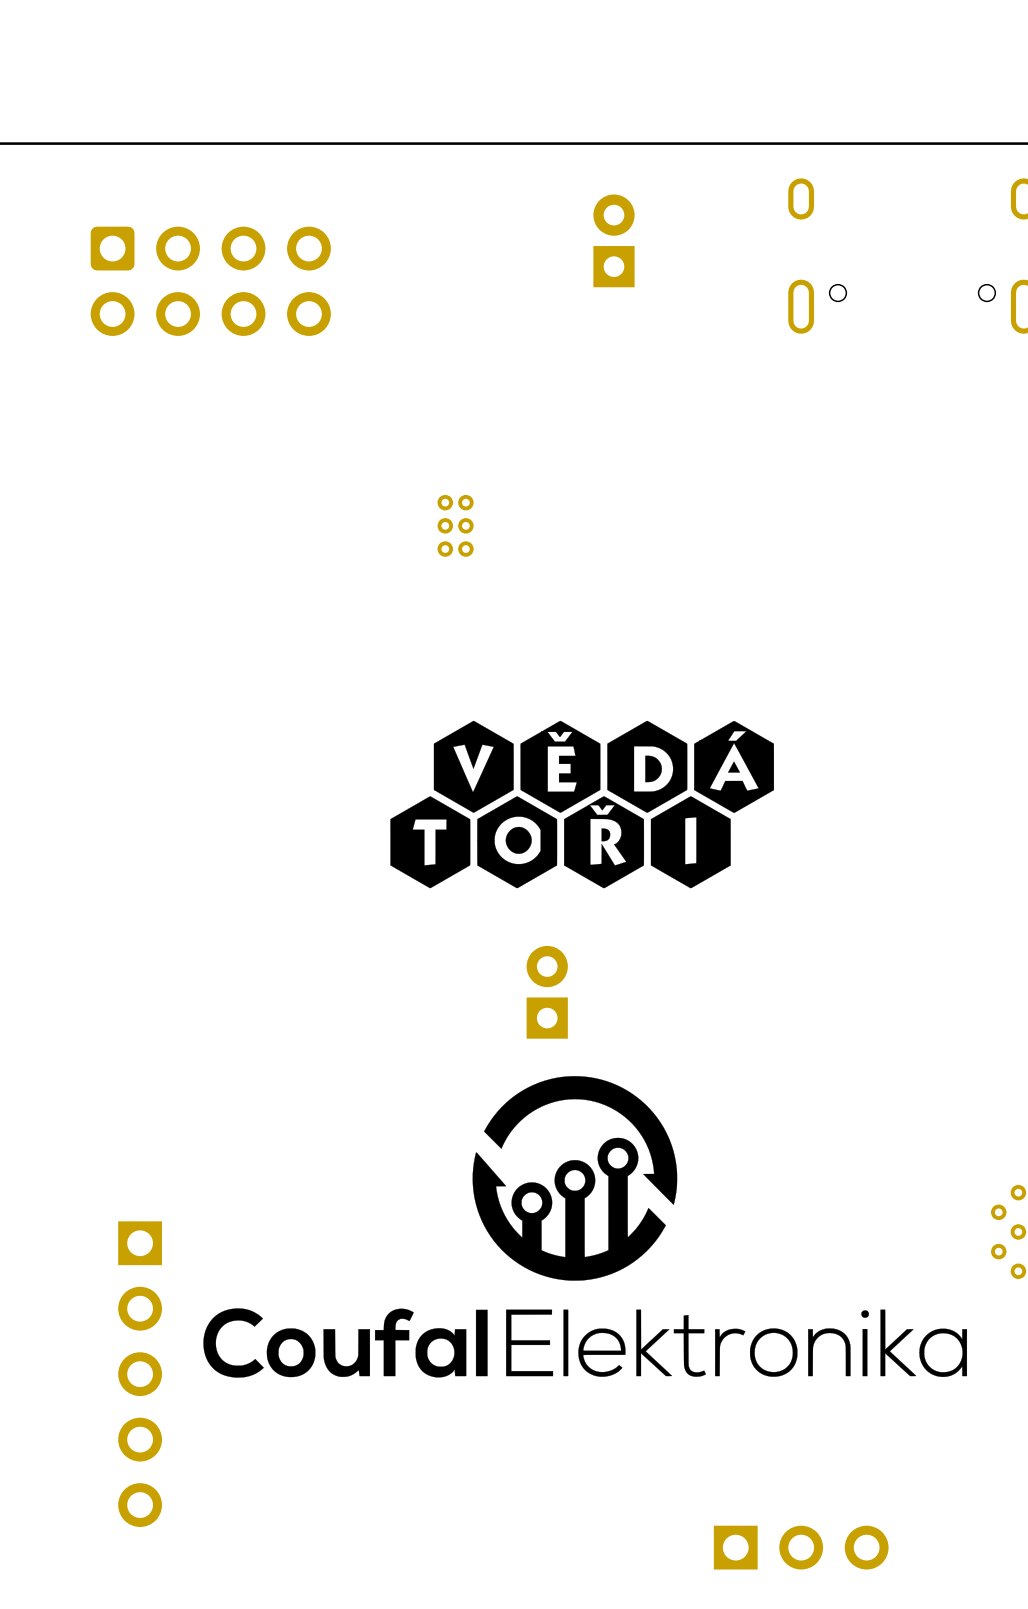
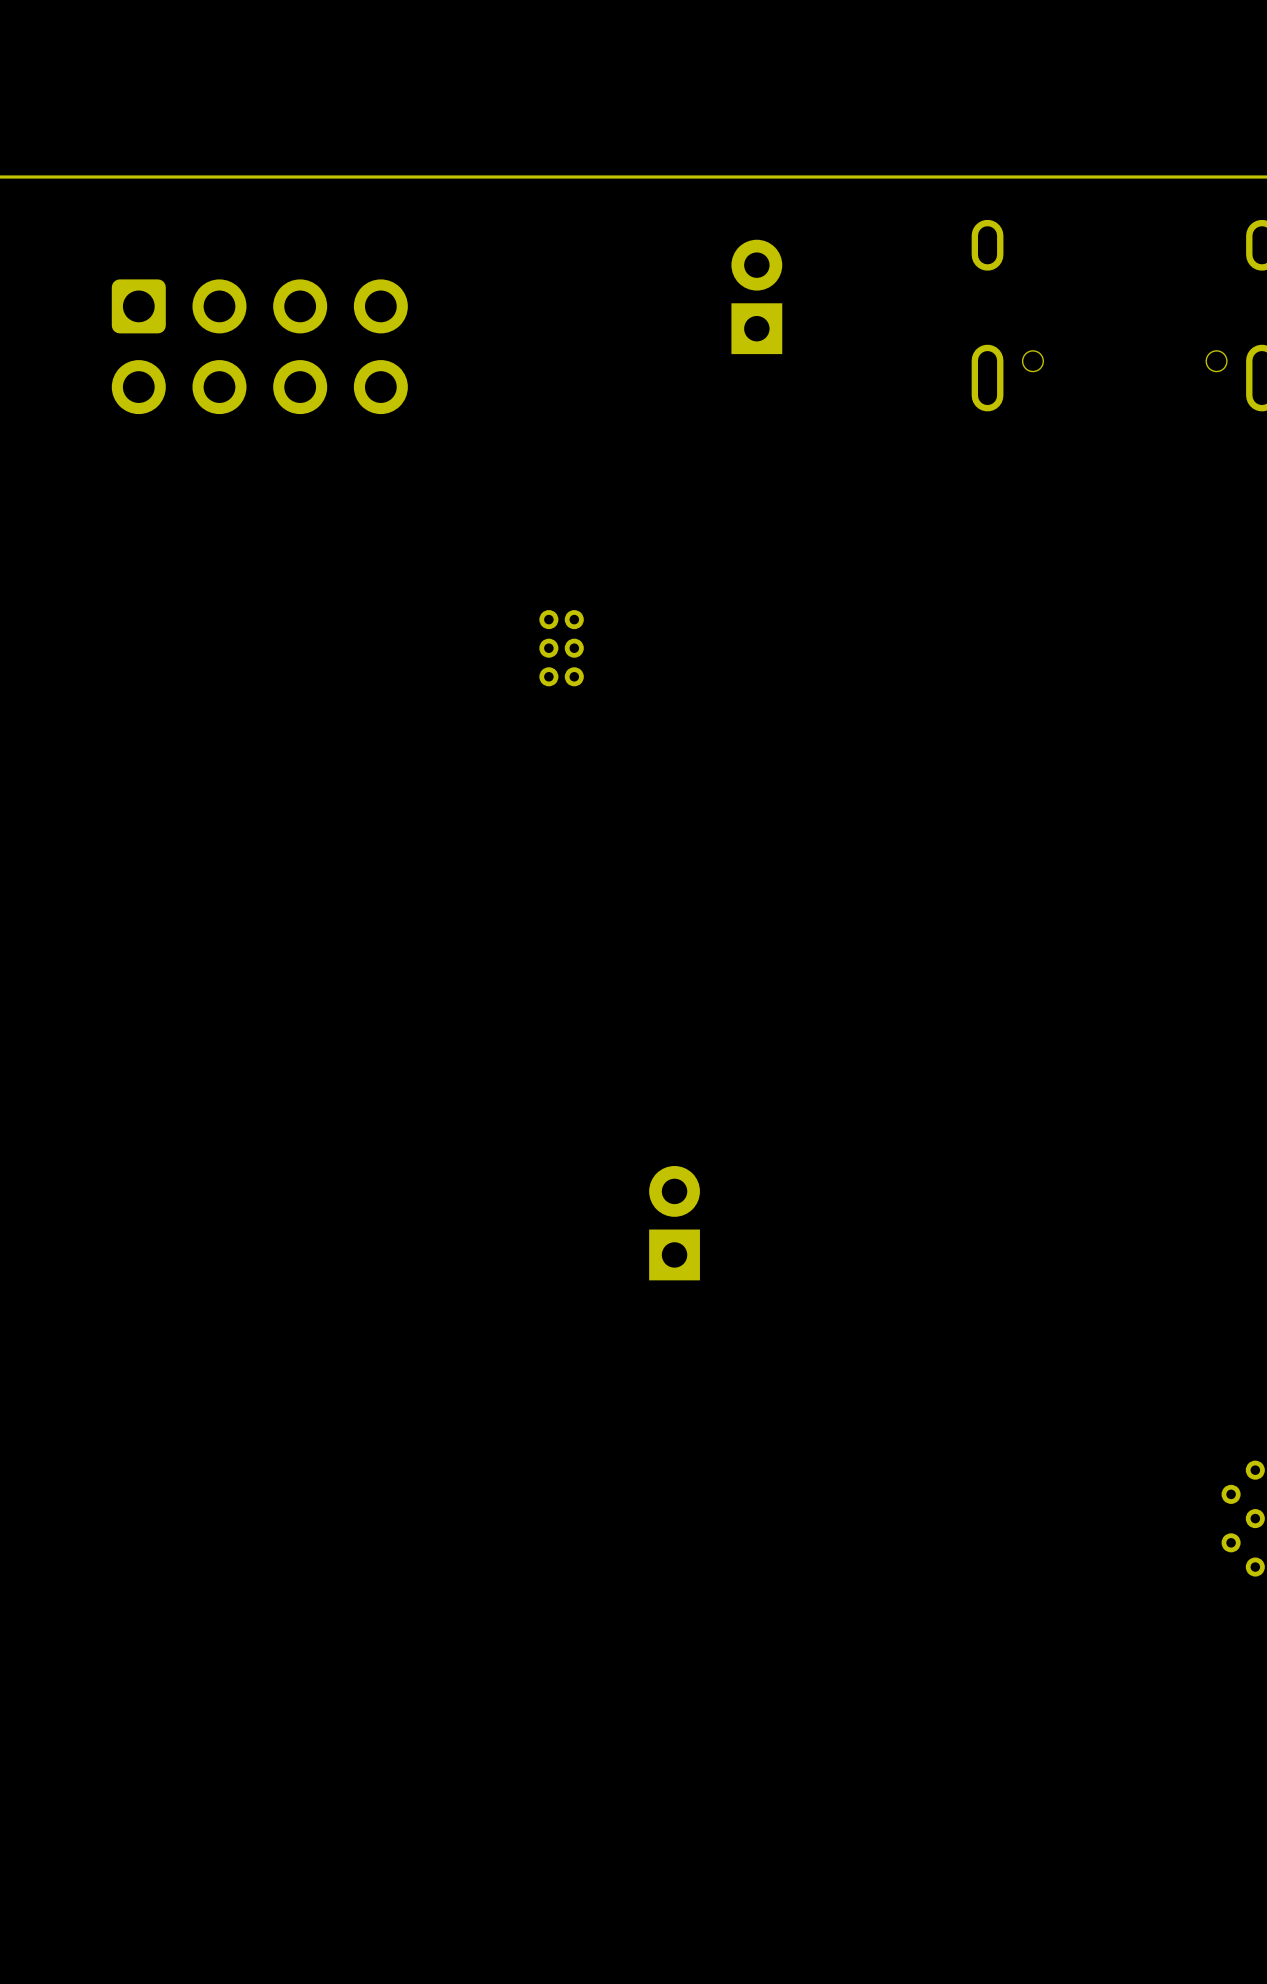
drawing: [390, 720, 775, 889] -> none
drawing: [203, 1076, 968, 1378] -> none
part: (140, 1374) -> none
part: (801, 1547) -> none

